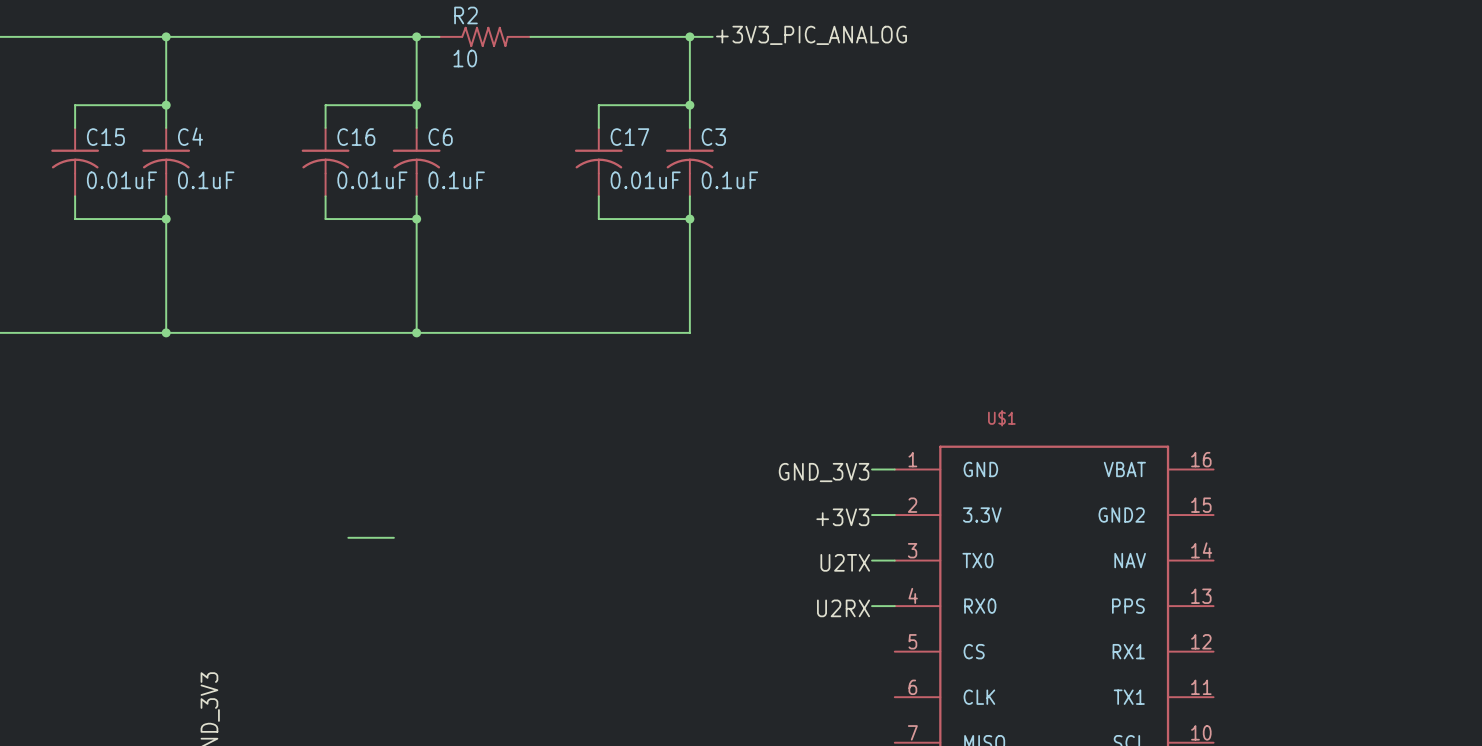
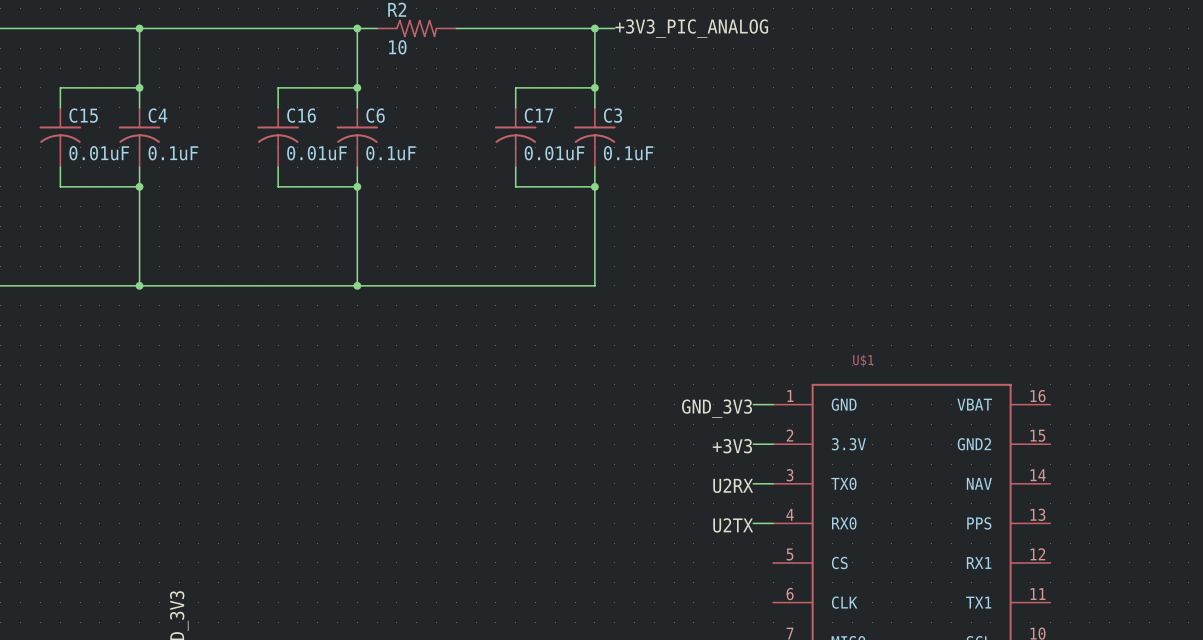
wire: (348, 537) (393, 537) -> none
label: U2TX (845, 562) -> U2RX (733, 485)
label: U2RX (843, 608) -> U2TX (733, 525)

